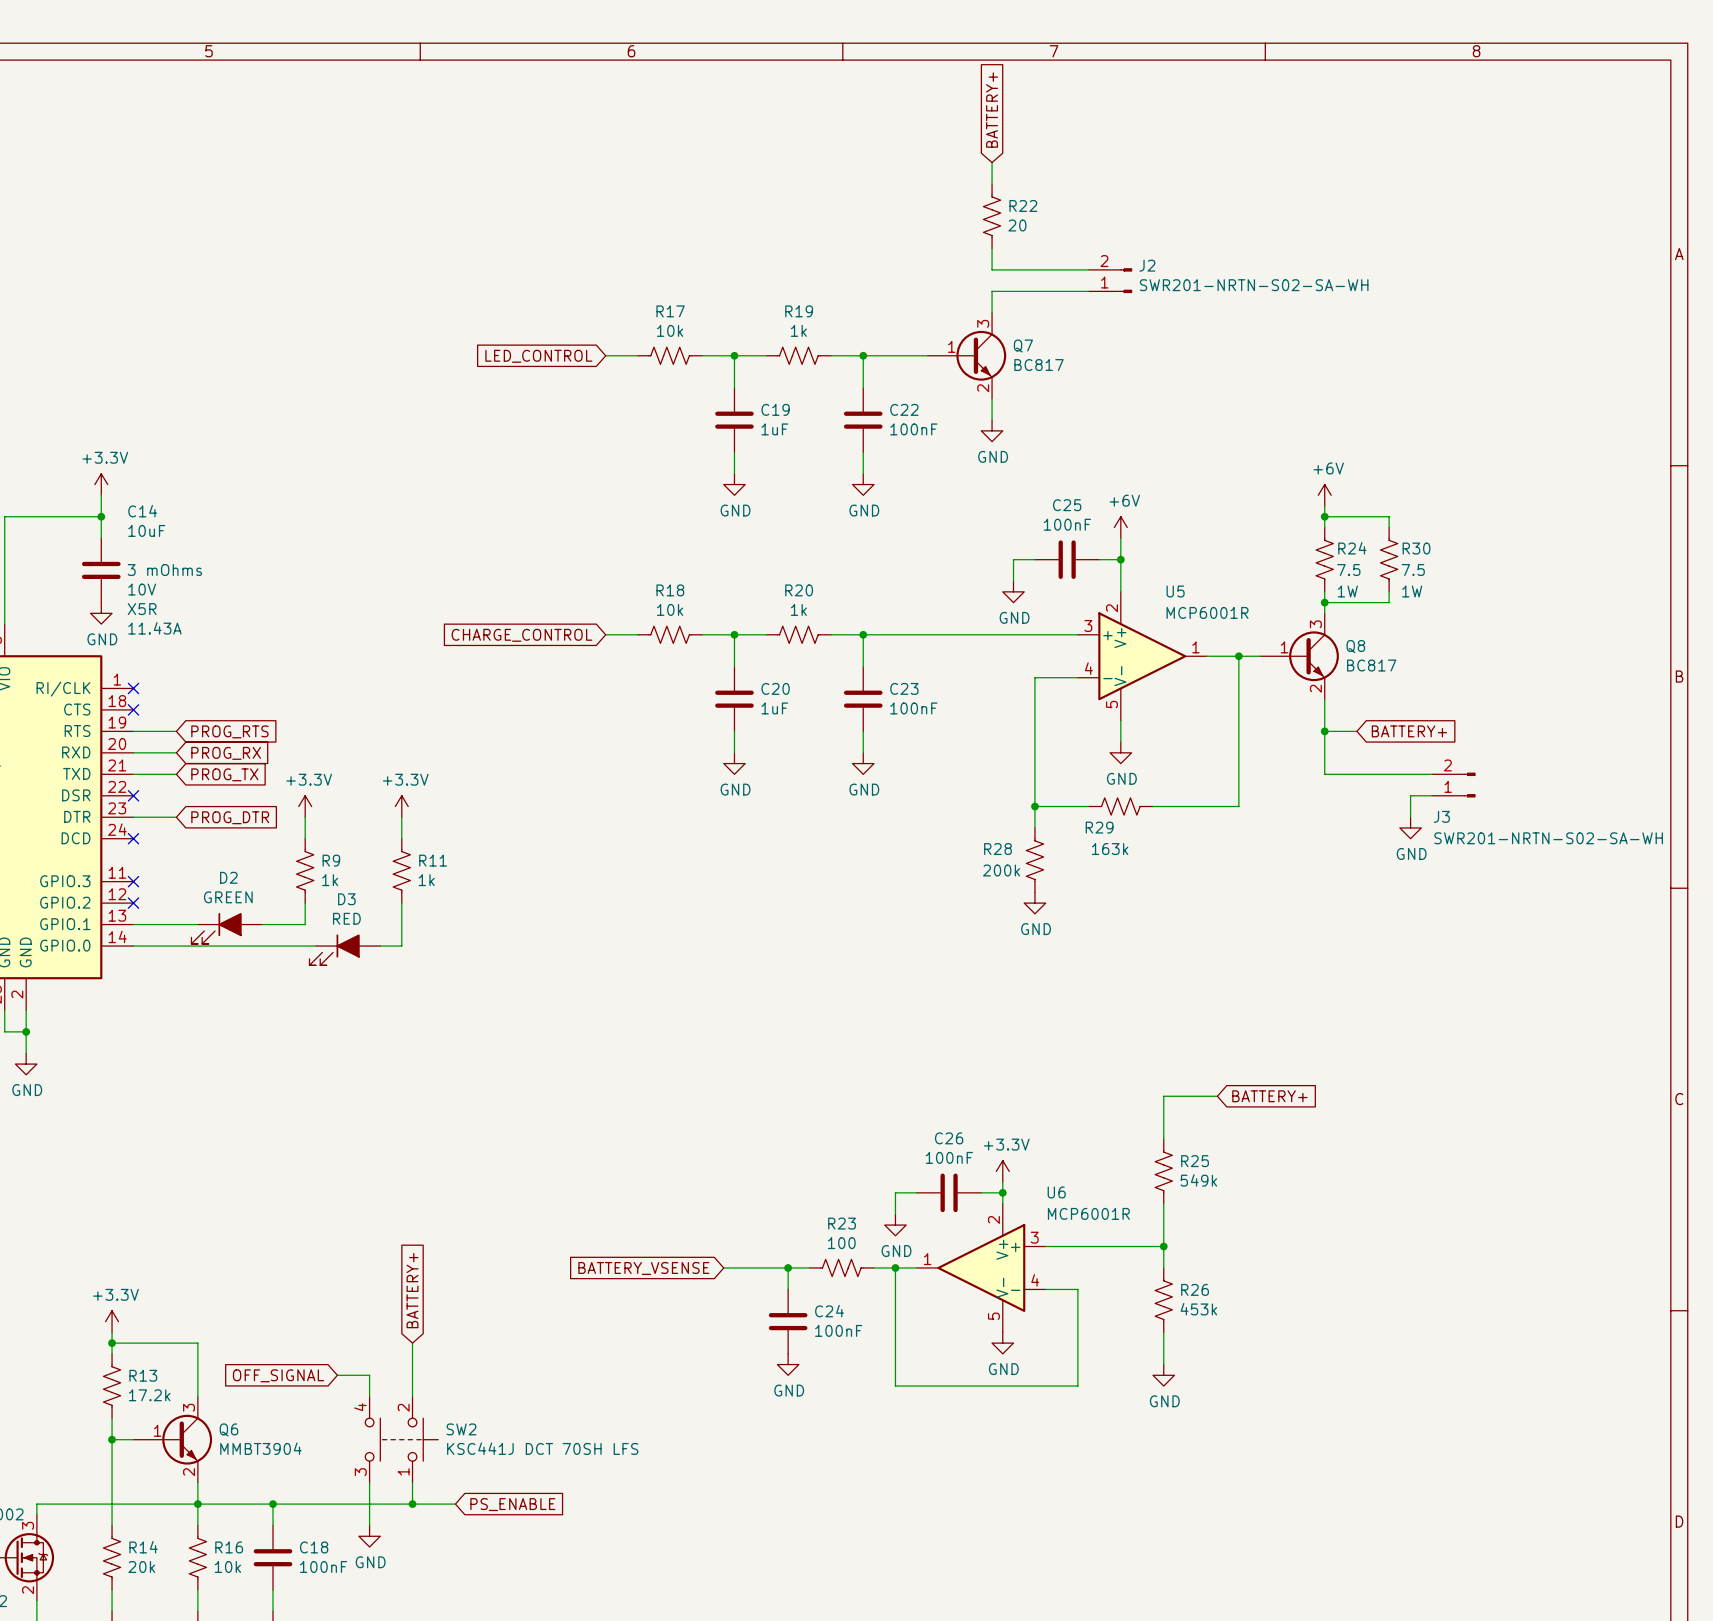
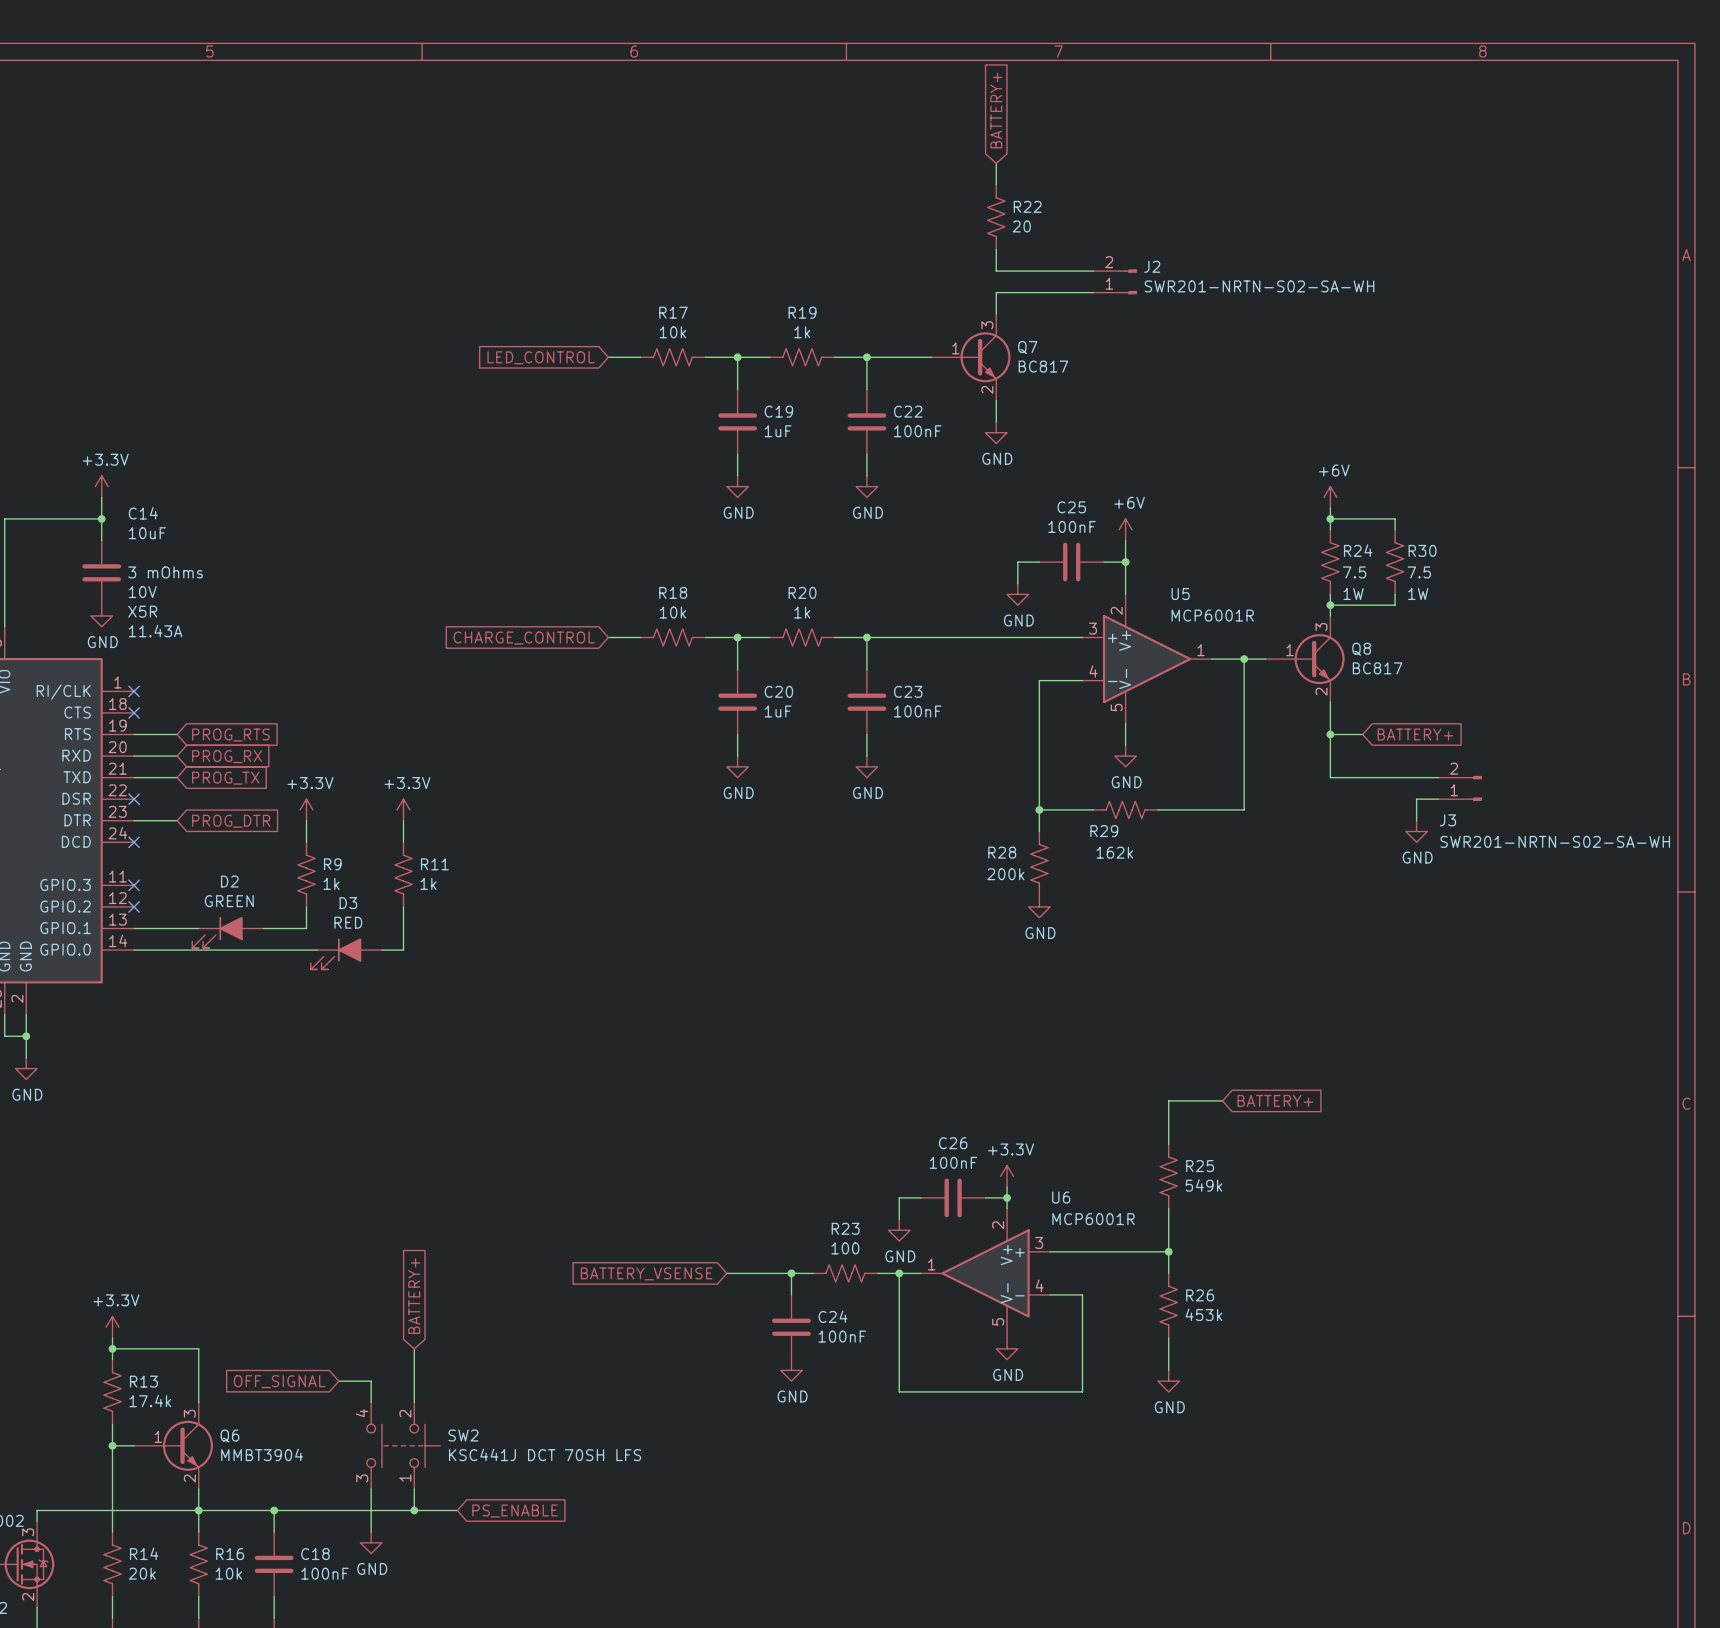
R29 value: 163k (1110, 849) -> 162k (1114, 852)
R13 value: 17.2k (149, 1395) -> 17.4k (150, 1400)

